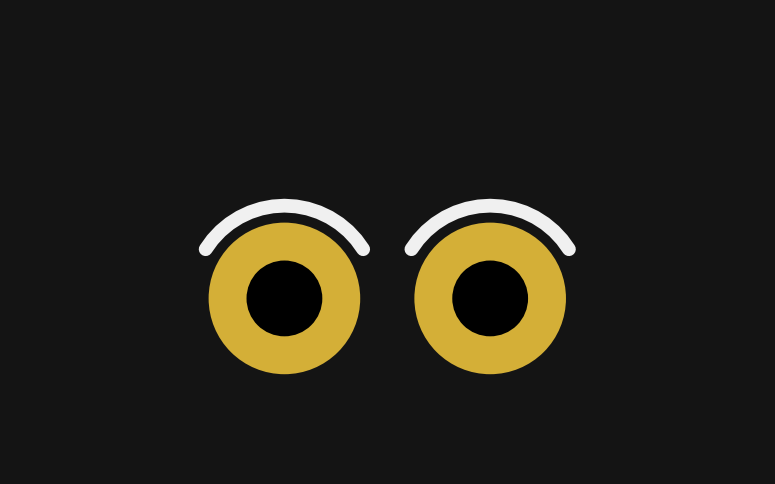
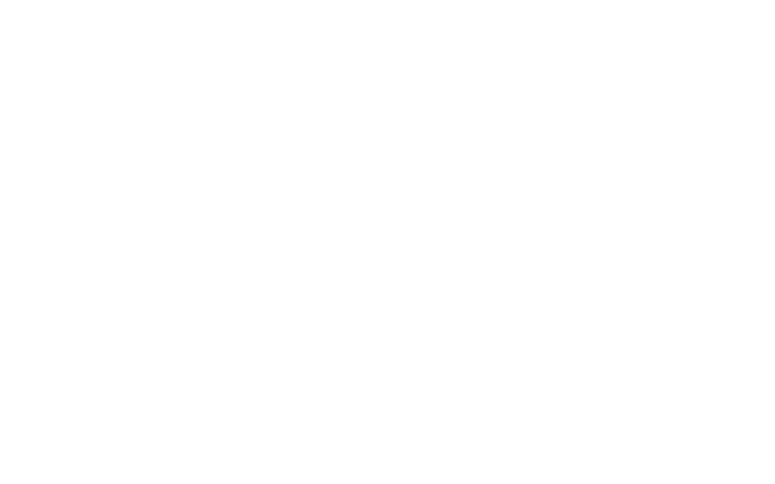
part: (284, 286) -> none
part: (490, 286) -> none

